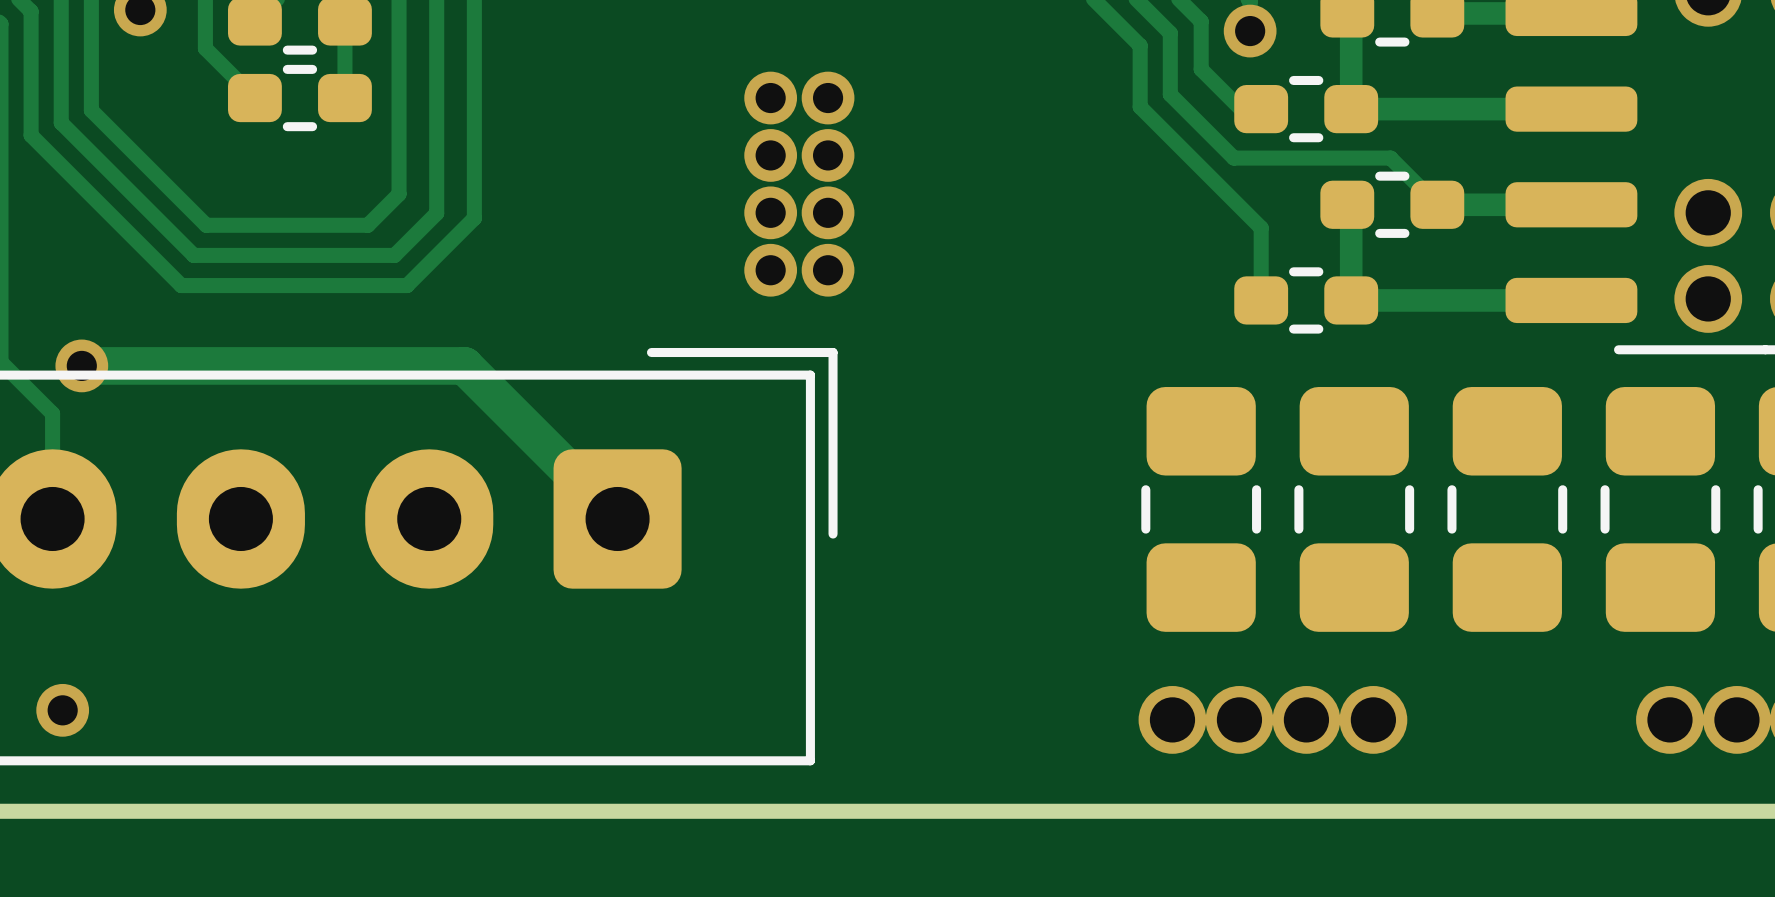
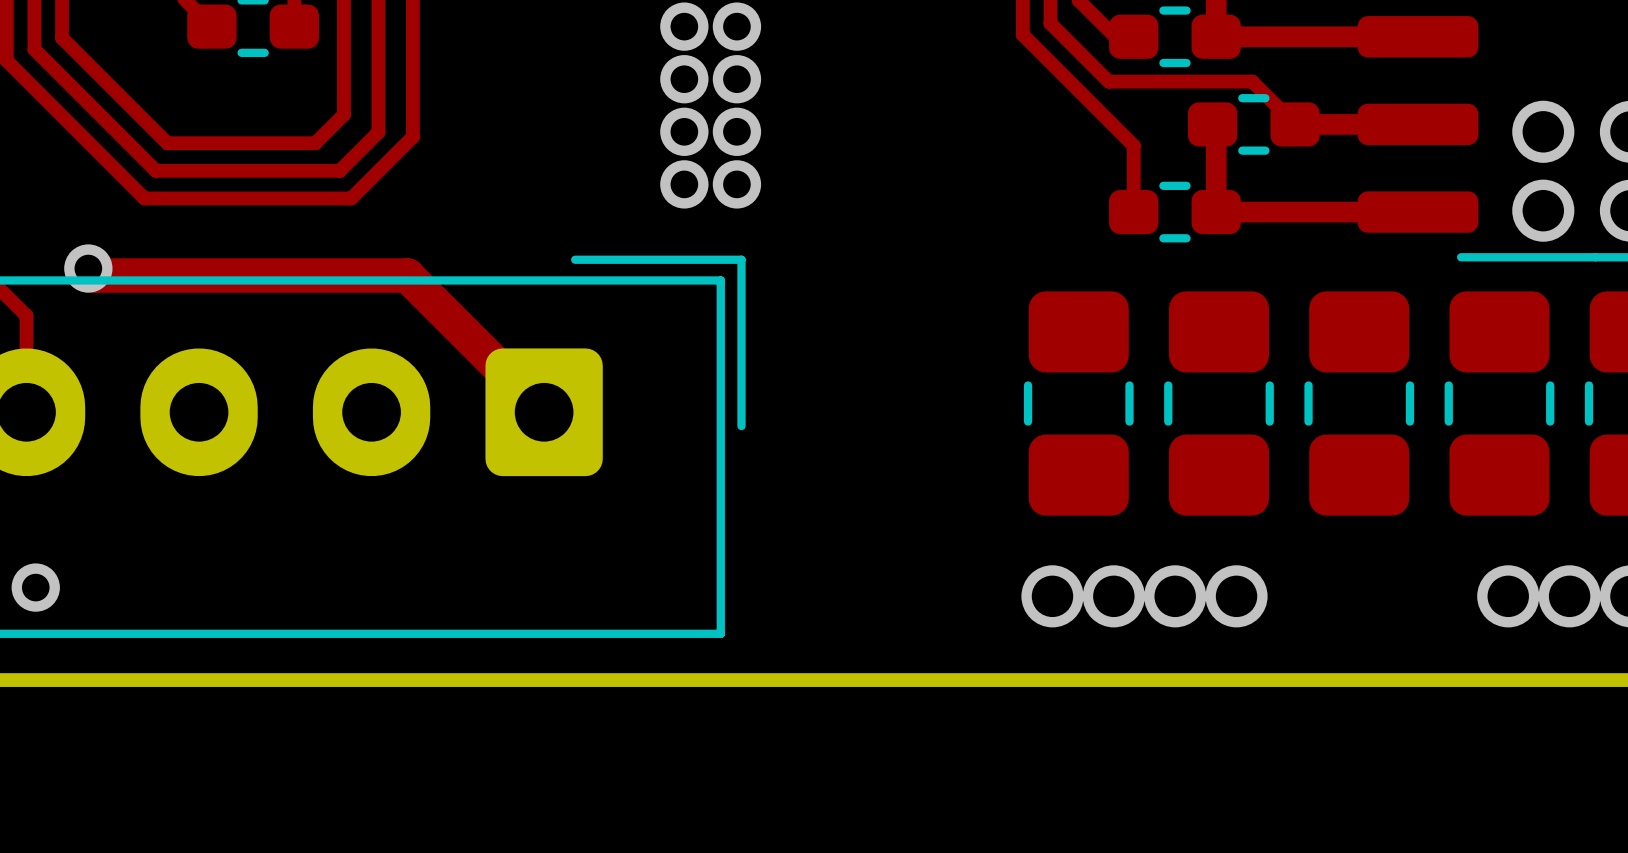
track: (81, 365) (464, 365) (468, 369) -> (88, 268) (95, 275) (407, 275)
via position: (81, 365) -> (88, 268)

